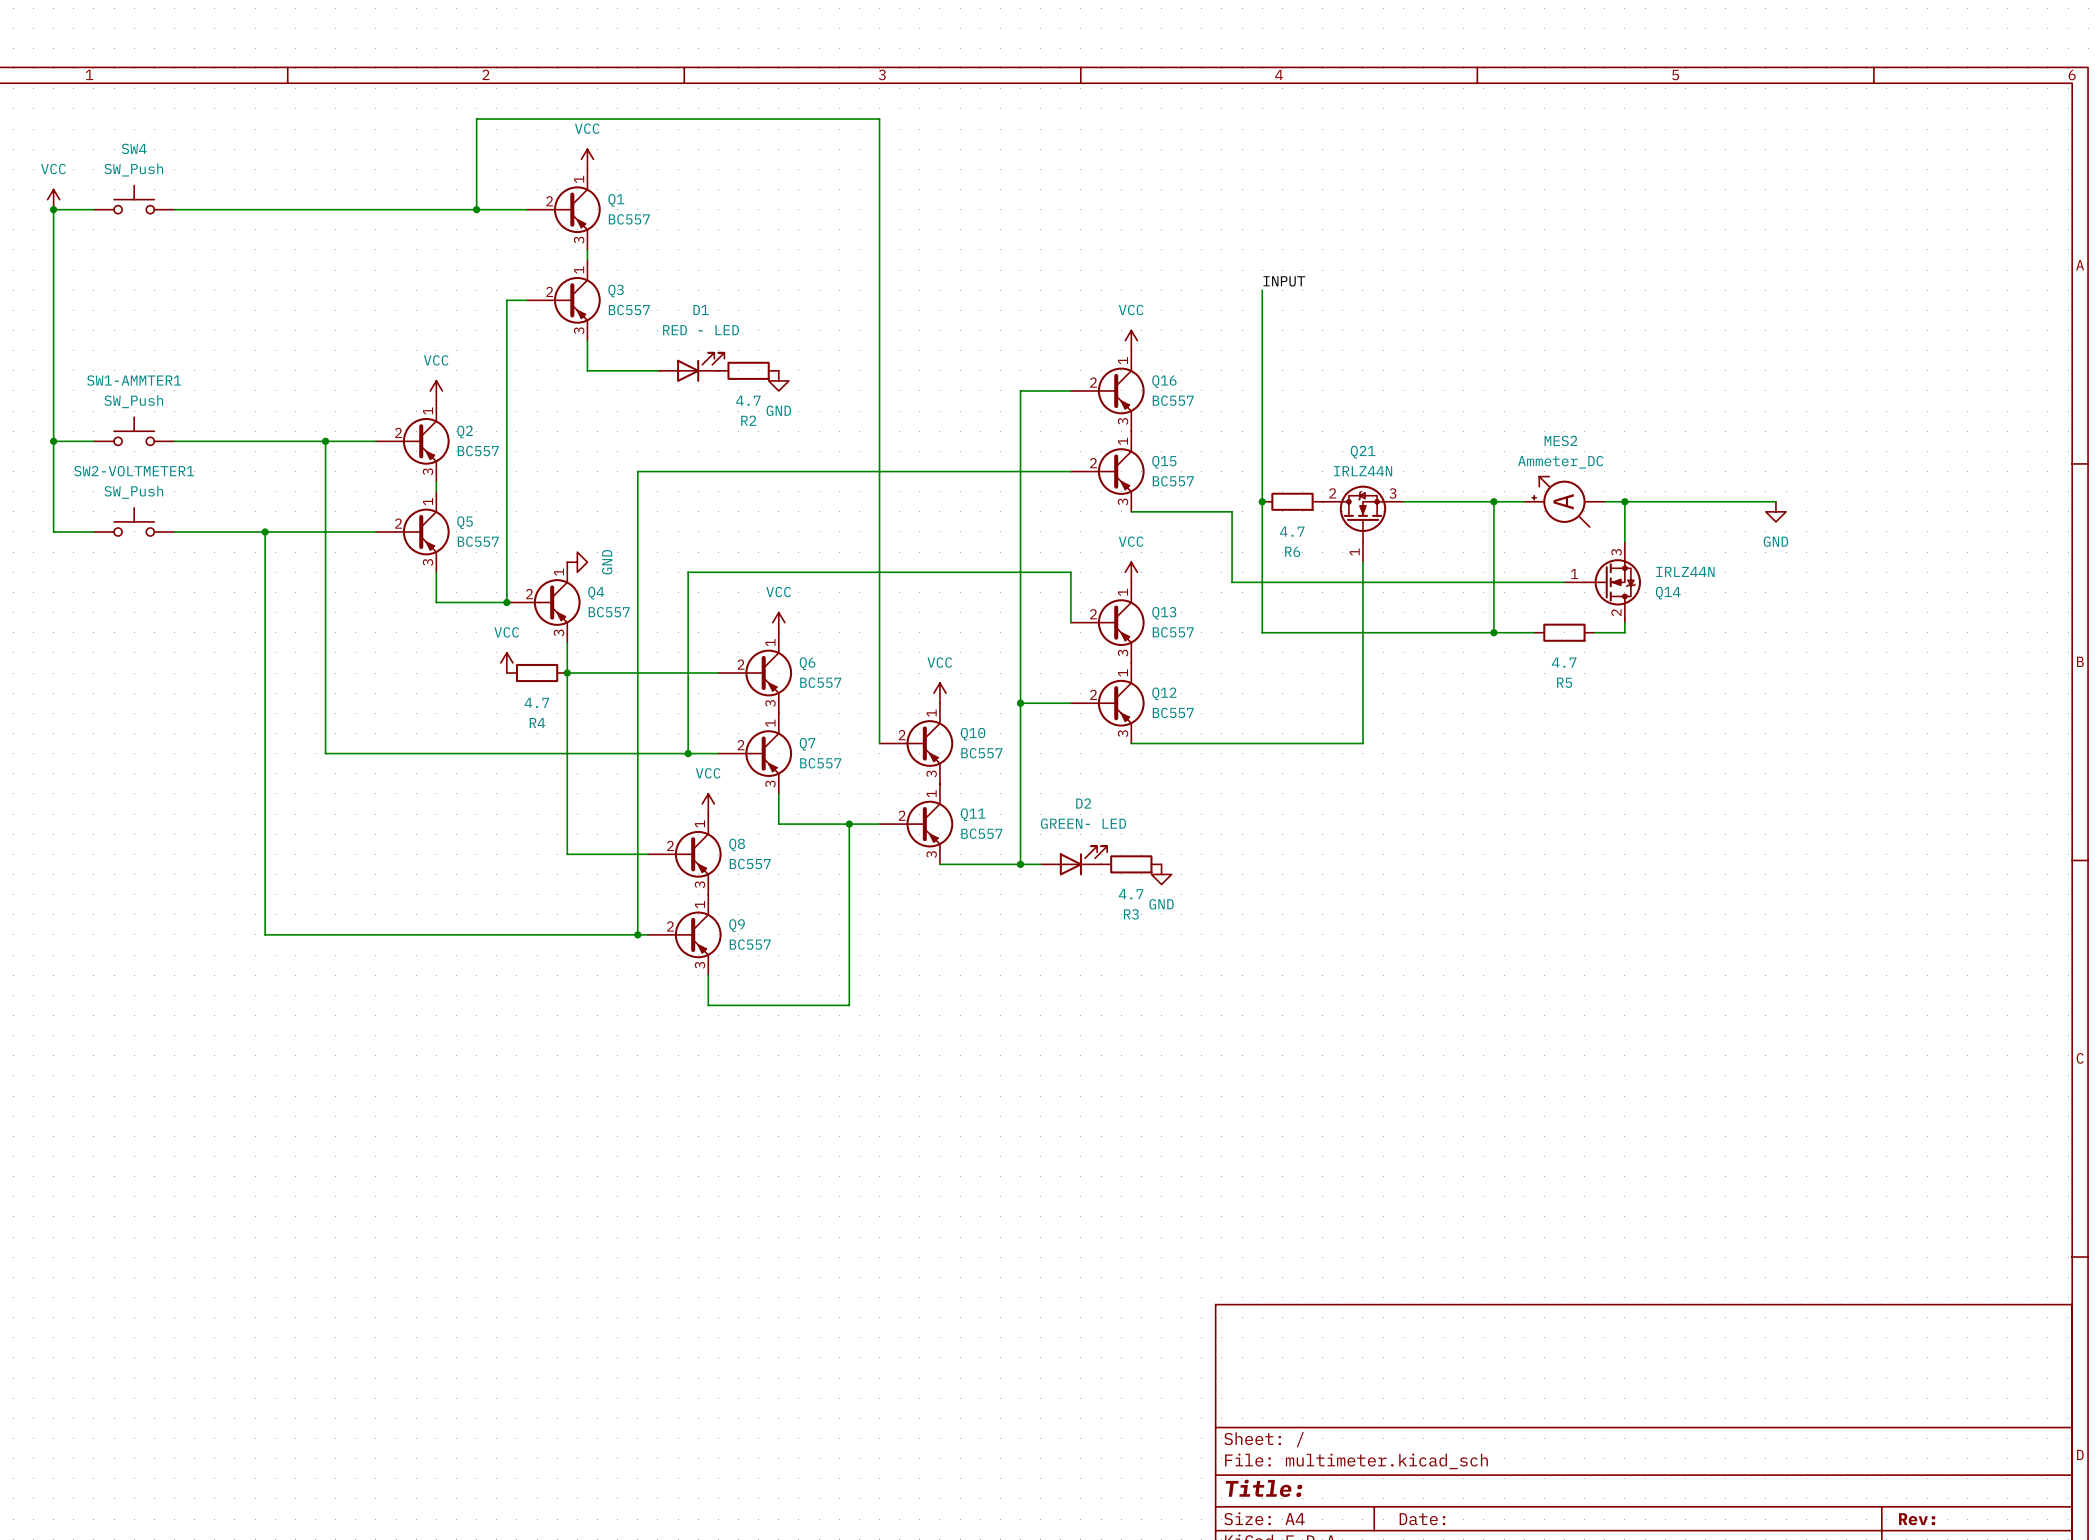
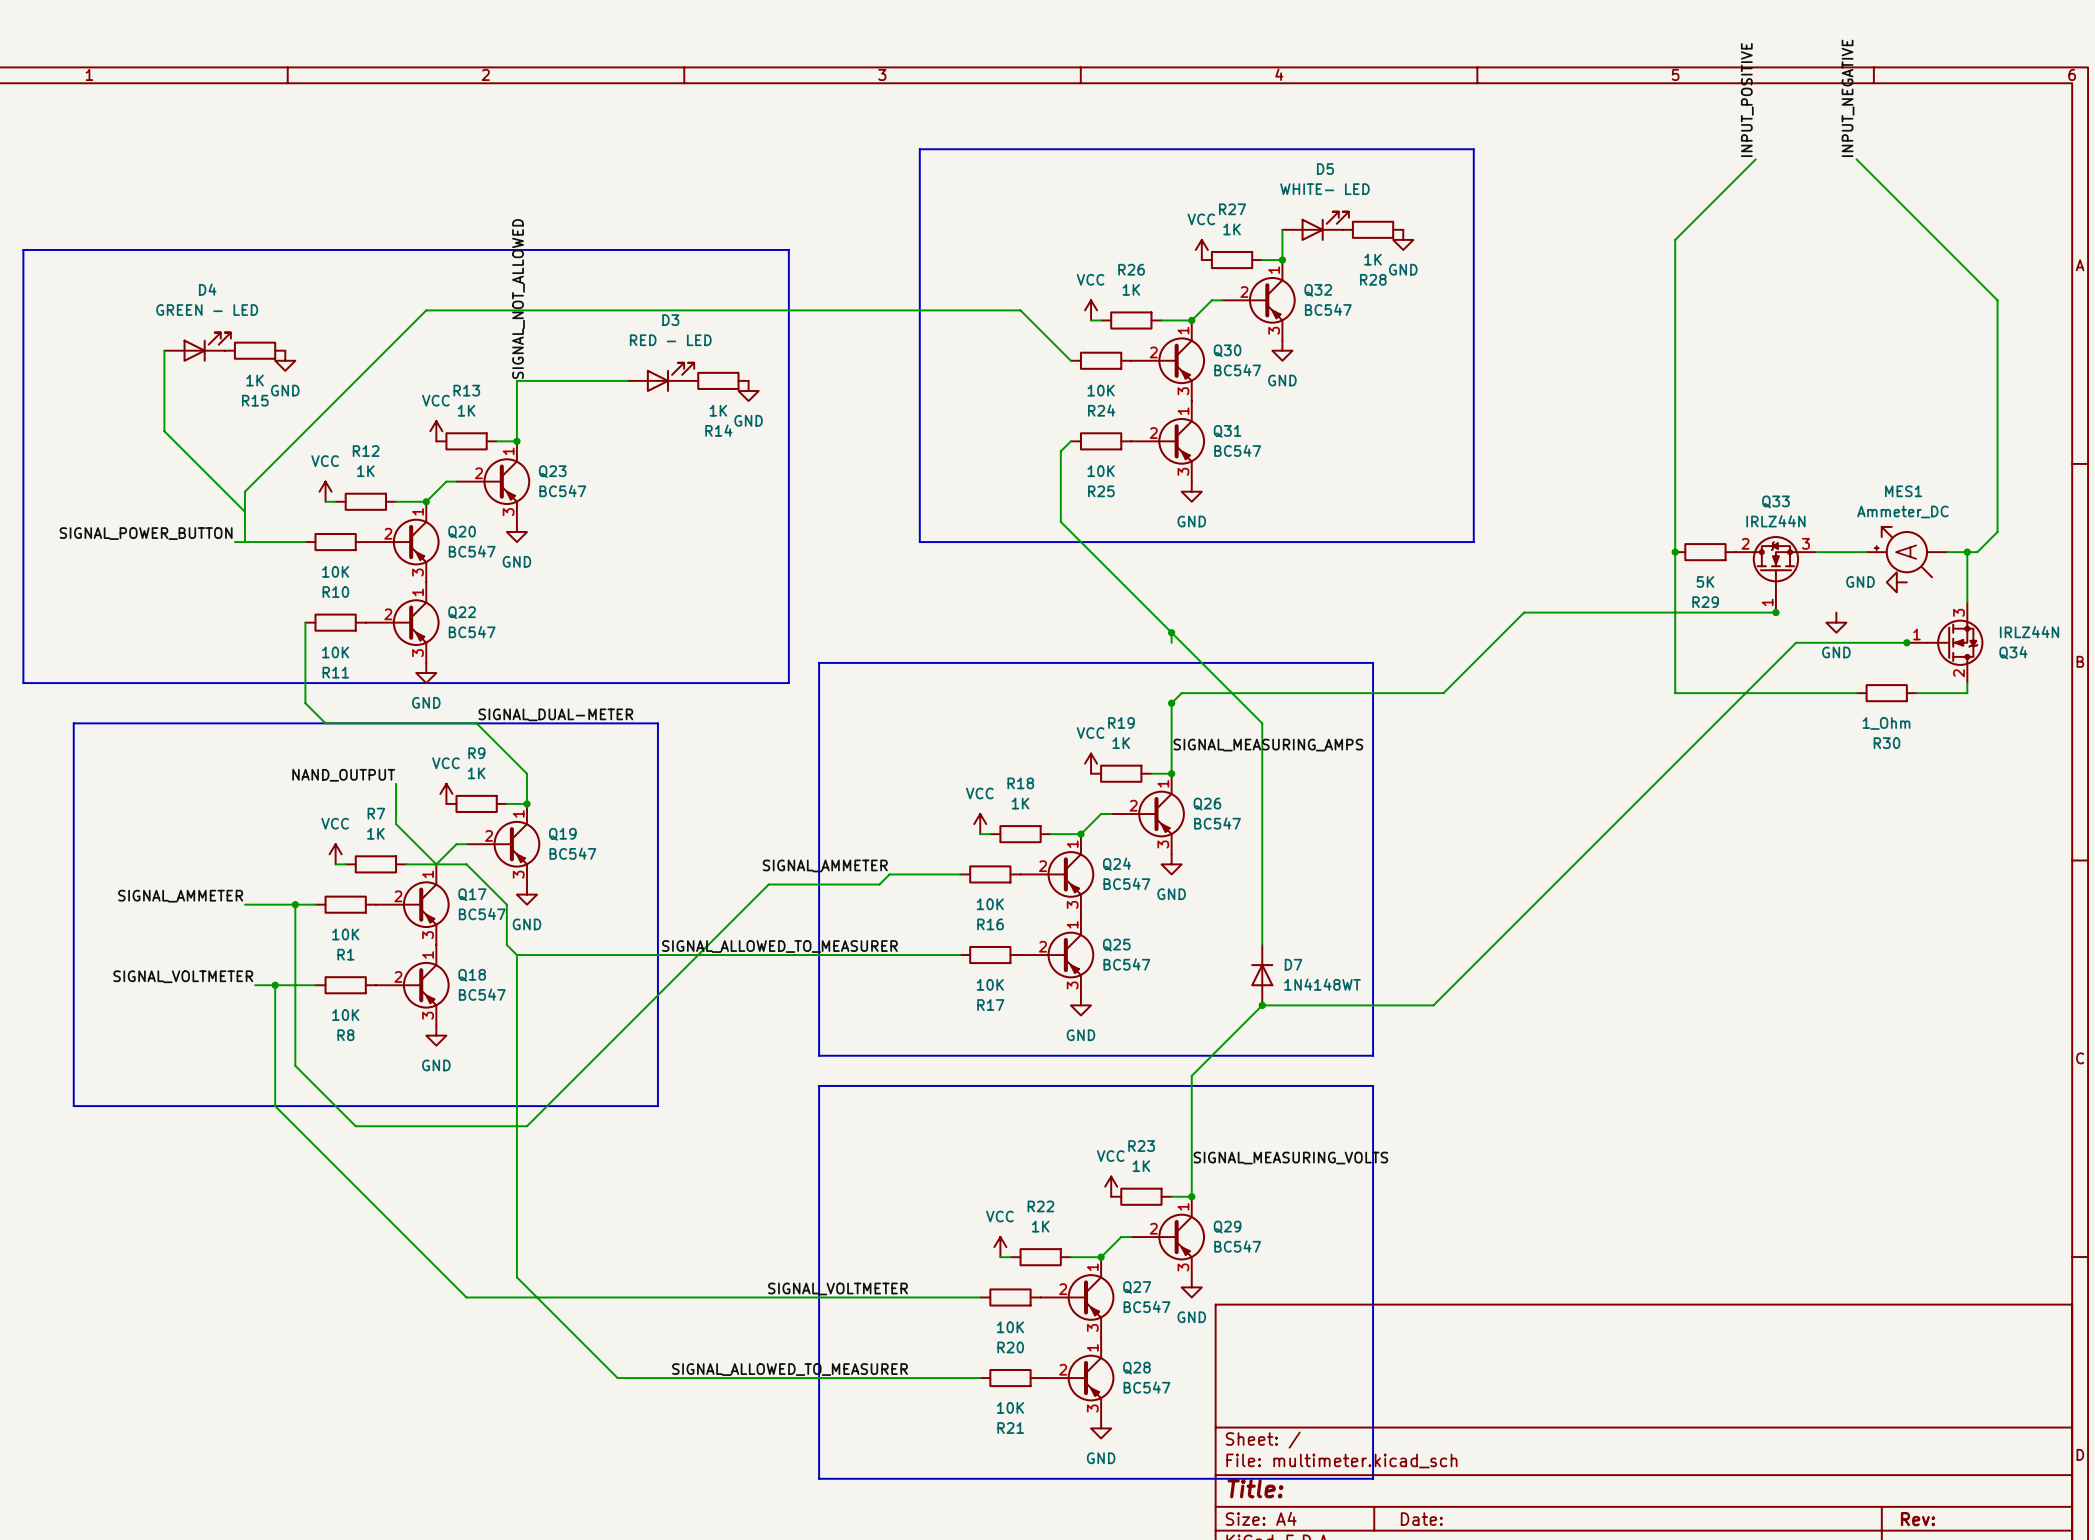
label: none -> INPUT_POSITIVE (1747, 100)
label: none -> INPUT_NEGATIVE (1848, 98)
line: none -> (919, 149) (1473, 149) (1473, 542) (919, 542) (919, 149)
power symbol: VCC (587, 159) -> none
wire: none -> (1755, 159) (1675, 239) (1675, 693) (1856, 693)
wire: none -> (1856, 159) (1997, 300) (1997, 531) (1977, 552) (1947, 552)
power symbol: VCC (53, 199) -> none
SW4: SW_Push (134, 199) -> none
junction: (53, 209) -> none
wire: (93, 209) (53, 209) (53, 531) (93, 531) -> none
wire: (174, 209) (527, 209) -> none
wire: (476, 209) (476, 119) (879, 119) (879, 743) -> none
junction: (476, 209) -> none
Q1: BC557 (563, 209) -> none
D5: none -> WHITE- LED (1315, 226)
wire: none -> (1282, 229) (1282, 260) (1262, 260)
R28: none -> 1K (1373, 229)
power symbol: none -> GND (1403, 239)
line: none -> (23, 249) (788, 249) (788, 683) (23, 683) (23, 249)
wire: (587, 249) (587, 260) -> none
power symbol: none -> VCC (1201, 249)
R27: none -> 1K (1232, 260)
junction: none -> (1282, 260)
label: INPUT (1284, 281) -> none
wire: (1262, 290) (1262, 632) (1534, 632) -> none
wire: (527, 300) (506, 300) (506, 602) (436, 602) (436, 572) -> none
Q3: BC557 (563, 300) -> none
wire: none -> (1221, 300) (1211, 300) (1191, 320) (1161, 320)
Q32: none -> BC547 (1258, 300)
label: none -> SIGNAL_NOT_ALLOWED (518, 299)
wire: none -> (1091, 320) (1101, 320)
R26: none -> 1K (1131, 320)
junction: none -> (1191, 320)
wire: (587, 340) (587, 370) (657, 370) -> none
power symbol position: VCC (1131, 340) -> VCC (1091, 310)
D4: none -> GREEN - LED (197, 347)
wire: none -> (164, 350) (164, 431) (244, 511)
R15: none -> 1K (255, 350)
power symbol: none -> GND (1282, 350)
power symbol: none -> GND (285, 360)
wire: none -> (1070, 360) (1020, 310) (426, 310) (244, 491) (244, 542)
R24: none -> 10K (1101, 360)
Q30: none -> BC547 (1168, 360)
D1: RED - LED (691, 367) -> none
R2: 4.7 (748, 370) -> none
D3: none -> RED - LED (660, 377)
wire: none -> (627, 380) (516, 380) (516, 441) (496, 441)
R14: none -> 1K (718, 380)
power symbol position: GND (778, 380) -> GND (748, 390)
power symbol position: VCC (436, 390) -> VCC (436, 431)
wire: (1070, 390) (1020, 390) (1020, 864) -> none
Q16: BC557 (1107, 390) -> none
SW1-AMMTER1: SW_Push (134, 431) -> none
wire: (53, 441) (93, 441) -> none
junction: (53, 441) -> none
wire: (174, 441) (375, 441) -> none
wire: (325, 441) (325, 753) (718, 753) -> none
junction: (325, 441) -> none
Q2: BC557 (412, 441) -> none
R13: none -> 1K (466, 441)
junction: none -> (516, 441)
wire: none -> (1070, 441) (1060, 451) (1060, 521) (1262, 723) (1262, 944)
R25: none -> 10K (1101, 441)
Q31: none -> BC547 (1168, 441)
wire: (1070, 471) (637, 471) (637, 934) -> none
Q15: BC557 (1107, 471) -> none
wire: (436, 481) (436, 491) -> none
wire: none -> (456, 481) (446, 481) (426, 501) (396, 501)
Q23: none -> BC547 (493, 481)
power symbol: none -> VCC (325, 491)
power symbol: none -> GND (1191, 491)
wire: none -> (325, 501) (335, 501)
R12: none -> 1K (365, 501)
junction: none -> (426, 501)
junction: (1262, 501) -> none
R6: 4.7 (1292, 501) -> none
wire: (1403, 501) (1524, 501) -> none
wire: (1493, 501) (1493, 632) -> none
junction: (1493, 501) -> none
MES2: Ammeter_DC (1564, 501) -> none
wire: (1604, 501) (1775, 501) -> none
wire: (1624, 501) (1624, 542) -> none
junction: (1624, 501) -> none
wire: (1131, 511) (1232, 511) (1232, 582) (1564, 582) -> none
power symbol: GND (1775, 511) -> none
SW2-VOLTMETER1: SW_Push (134, 521) -> none
Q21: IRLZ44N (1362, 523) -> none
wire: (174, 531) (375, 531) -> none
wire: (265, 531) (265, 934) (647, 934) -> none
junction: (265, 531) -> none
Q5: BC557 (412, 531) -> none
label: none -> SIGNAL_POWER_BUTTON (146, 533)
wire: none -> (234, 542) (305, 542)
R10: none -> 10K (335, 542)
Q20: none -> BC547 (402, 542)
junction: none -> (1675, 552)
R29: none -> 5K (1705, 552)
wire: none -> (1816, 552) (1866, 552)
MES1: none -> Ammeter_DC (1906, 552)
wire: none -> (1967, 552) (1967, 602)
junction: none -> (1967, 552)
power symbol rotation: 0° (577, 562) -> 90° clockwise (516, 531)
power symbol position: GND (577, 562) -> GND (516, 531)
wire: (1362, 562) (1362, 743) (1131, 743) -> none
power symbol: VCC (1131, 572) -> none
Q33: none -> IRLZ44N (1775, 574)
Q14: IRLZ44N (1602, 582) -> none
power symbol: none -> GND (1896, 582)
junction: (506, 602) -> none
Q4: BC557 (543, 602) -> none
wire: none -> (1775, 612) (1524, 612) (1443, 693) (1181, 693) (1171, 703) (1171, 773) (1151, 773)
junction: none -> (1775, 612)
wire: none -> (305, 622) (305, 703) (325, 723) (476, 723) (527, 773) (527, 803) (506, 803)
R11: none -> 10K (335, 622)
Q22: none -> BC547 (402, 622)
power symbol: VCC (778, 622) -> none
wire: (1070, 622) (1070, 572) (688, 572) (688, 753) -> none
Q13: BC557 (1107, 622) -> none
wire: (1624, 622) (1624, 632) (1594, 632) -> none
power symbol: none -> GND (1836, 622)
wire: none -> (1171, 632) (1171, 642)
junction: none -> (1171, 632)
junction: (1493, 632) -> none
R5: 4.7 (1564, 632) -> none
wire: (567, 642) (567, 854) (647, 854) -> none
wire: none -> (1906, 642) (1796, 642) (1433, 1005) (1262, 1005) (1191, 1075) (1191, 1196) (1171, 1196)
junction: none -> (1906, 642)
Q34: none -> IRLZ44N (1945, 642)
power symbol: VCC (506, 662) -> none
line: none -> (819, 662) (819, 1055) (1373, 1055) (1373, 662) (819, 662)
power symbol: none -> GND (426, 673)
R4: 4.7 (537, 673) -> none
wire: (567, 673) (718, 673) -> none
junction: (567, 673) -> none
Q6: BC557 (755, 673) -> none
wire: none -> (1967, 683) (1967, 693) (1916, 693)
power symbol: VCC (939, 693) -> none
R30: none -> 1_Ohm (1886, 693)
wire: (1020, 703) (1070, 703) -> none
junction: (1020, 703) -> none
Q12: BC557 (1107, 703) -> none
junction: none -> (1171, 703)
label: none -> SIGNAL_DUAL-METER (555, 714)
line: none -> (73, 723) (657, 723) (657, 1106) (73, 1106) (73, 723)
Q10: BC557 (916, 743) -> none
label: none -> SIGNAL_MEASURING_AMPS (1268, 745)
junction: (688, 753) -> none
Q7: BC557 (755, 753) -> none
power symbol: none -> VCC (1091, 763)
R19: none -> 1K (1121, 773)
junction: none -> (1171, 773)
label: none -> NAND_OUTPUT (343, 775)
wire: none -> (396, 783) (396, 824) (436, 864) (456, 844) (466, 844)
power symbol: none -> VCC (446, 793)
wire: (778, 793) (778, 824) (879, 824) -> none
R9: none -> 1K (476, 803)
junction: none -> (527, 803)
power symbol: VCC (708, 803) -> none
wire: none -> (1111, 814) (1101, 814) (1080, 834) (1050, 834)
Q26: none -> BC547 (1148, 814)
wire: (849, 824) (849, 1005) (708, 1005) (708, 975) -> none
junction: (849, 824) -> none
Q11: BC557 (916, 824) -> none
power symbol: none -> VCC (980, 824)
wire: none -> (980, 834) (990, 834)
R18: none -> 1K (1020, 834)
junction: none -> (1080, 834)
Q19: none -> BC547 (503, 844)
power symbol: none -> VCC (335, 854)
Q8: BC557 (684, 854) -> none
D2: GREEN- LED (1073, 860) -> none
wire: none -> (335, 864) (345, 864)
R7: none -> 1K (375, 864)
wire: none -> (406, 864) (466, 864) (506, 904) (506, 944) (516, 955)
wire: (939, 864) (1040, 864) -> none
junction: (1020, 864) -> none
R3: 4.7 (1131, 864) -> none
label: none -> SIGNAL_AMMETER (825, 865)
wire: none -> (960, 874) (889, 874) (879, 884) (768, 884) (527, 1126) (355, 1126) (295, 1065) (295, 904)
R16: none -> 10K (990, 874)
Q24: none -> BC547 (1057, 874)
power symbol position: GND (1161, 874) -> GND (1171, 864)
power symbol: none -> GND (527, 894)
label: none -> SIGNAL_AMMETER (180, 896)
wire: none -> (244, 904) (315, 904)
junction: none -> (295, 904)
R1: none -> 10K (345, 904)
Q17: none -> BC547 (412, 904)
junction: (637, 934) -> none
Q9: BC557 (684, 934) -> none
label: none -> SIGNAL_ALLOWED_TO_MEASURER (779, 946)
wire: none -> (516, 955) (516, 1277) (617, 1378) (980, 1378)
wire: none -> (516, 955) (960, 955)
R17: none -> 10K (990, 955)
Q25: none -> BC547 (1057, 955)
D7: none -> 1N4148WT (1262, 975)
label: none -> SIGNAL_VOLTMETER (183, 976)
wire: none -> (255, 985) (315, 985)
wire: none -> (275, 985) (275, 1106) (466, 1297) (980, 1297)
junction: none -> (275, 985)
R8: none -> 10K (345, 985)
Q18: none -> BC547 (412, 985)
power symbol: none -> GND (1080, 1005)
junction: none -> (1262, 1005)
power symbol: none -> GND (436, 1035)
line: none -> (819, 1085) (1373, 1085) (1373, 1478) (819, 1478) (819, 1085)
label: none -> SIGNAL_MEASURING_VOLTS (1290, 1158)
power symbol: none -> VCC (1111, 1186)
R23: none -> 1K (1141, 1196)
junction: none -> (1191, 1196)
wire: none -> (1131, 1237) (1121, 1237) (1101, 1257) (1070, 1257)
Q29: none -> BC547 (1168, 1237)
power symbol: none -> VCC (1000, 1247)
wire: none -> (1000, 1257) (1010, 1257)
R22: none -> 1K (1040, 1257)
junction: none -> (1101, 1257)
power symbol: none -> GND (1191, 1287)
label: none -> SIGNAL_VOLTMETER (837, 1288)
R20: none -> 10K (1010, 1297)
Q27: none -> BC547 (1077, 1297)
label: none -> SIGNAL_ALLOWED_TO_MEASURER (790, 1369)
R21: none -> 10K (1010, 1378)
Q28: none -> BC547 (1077, 1378)
power symbol: none -> GND (1101, 1428)

